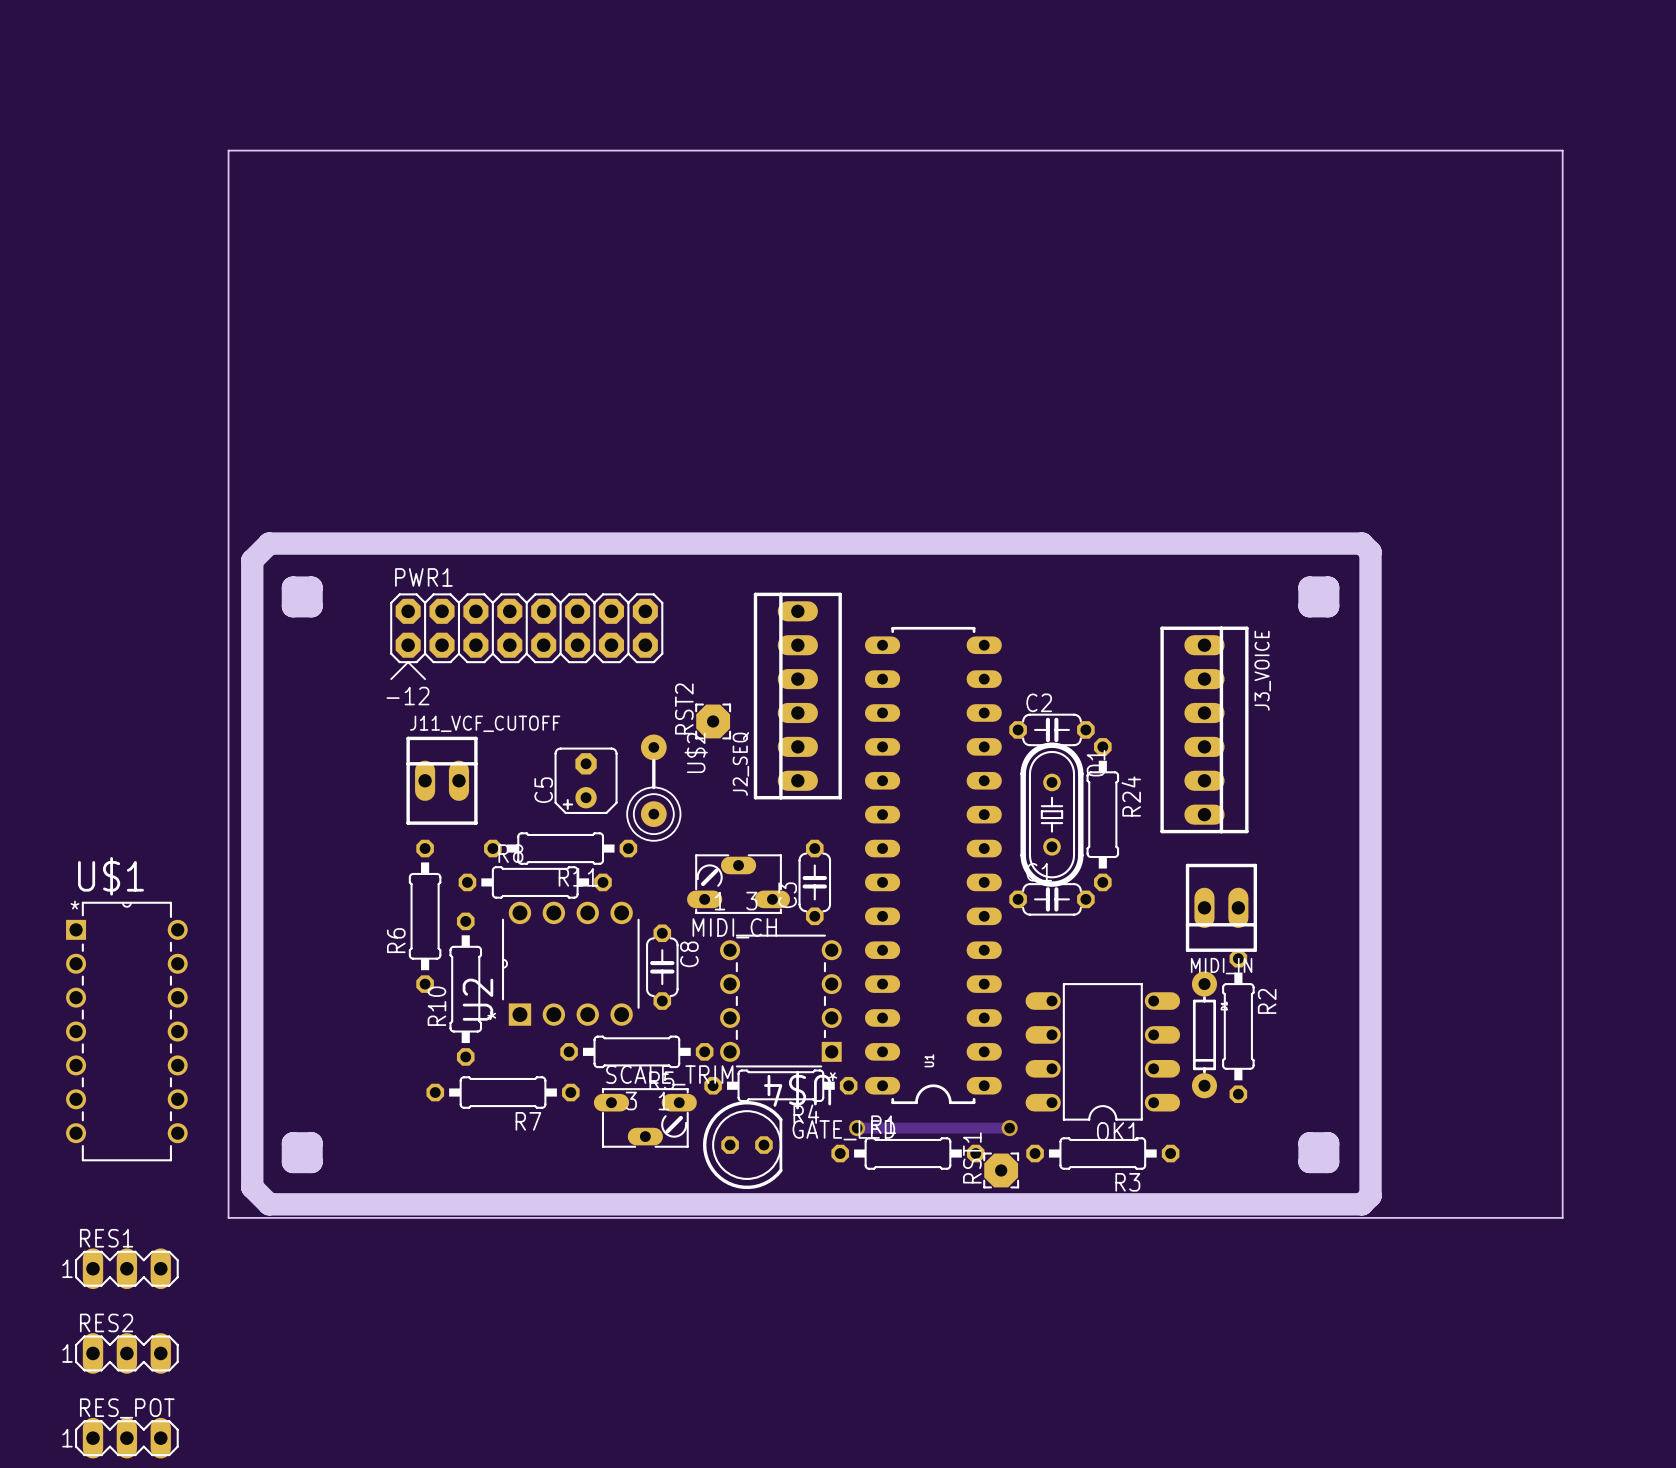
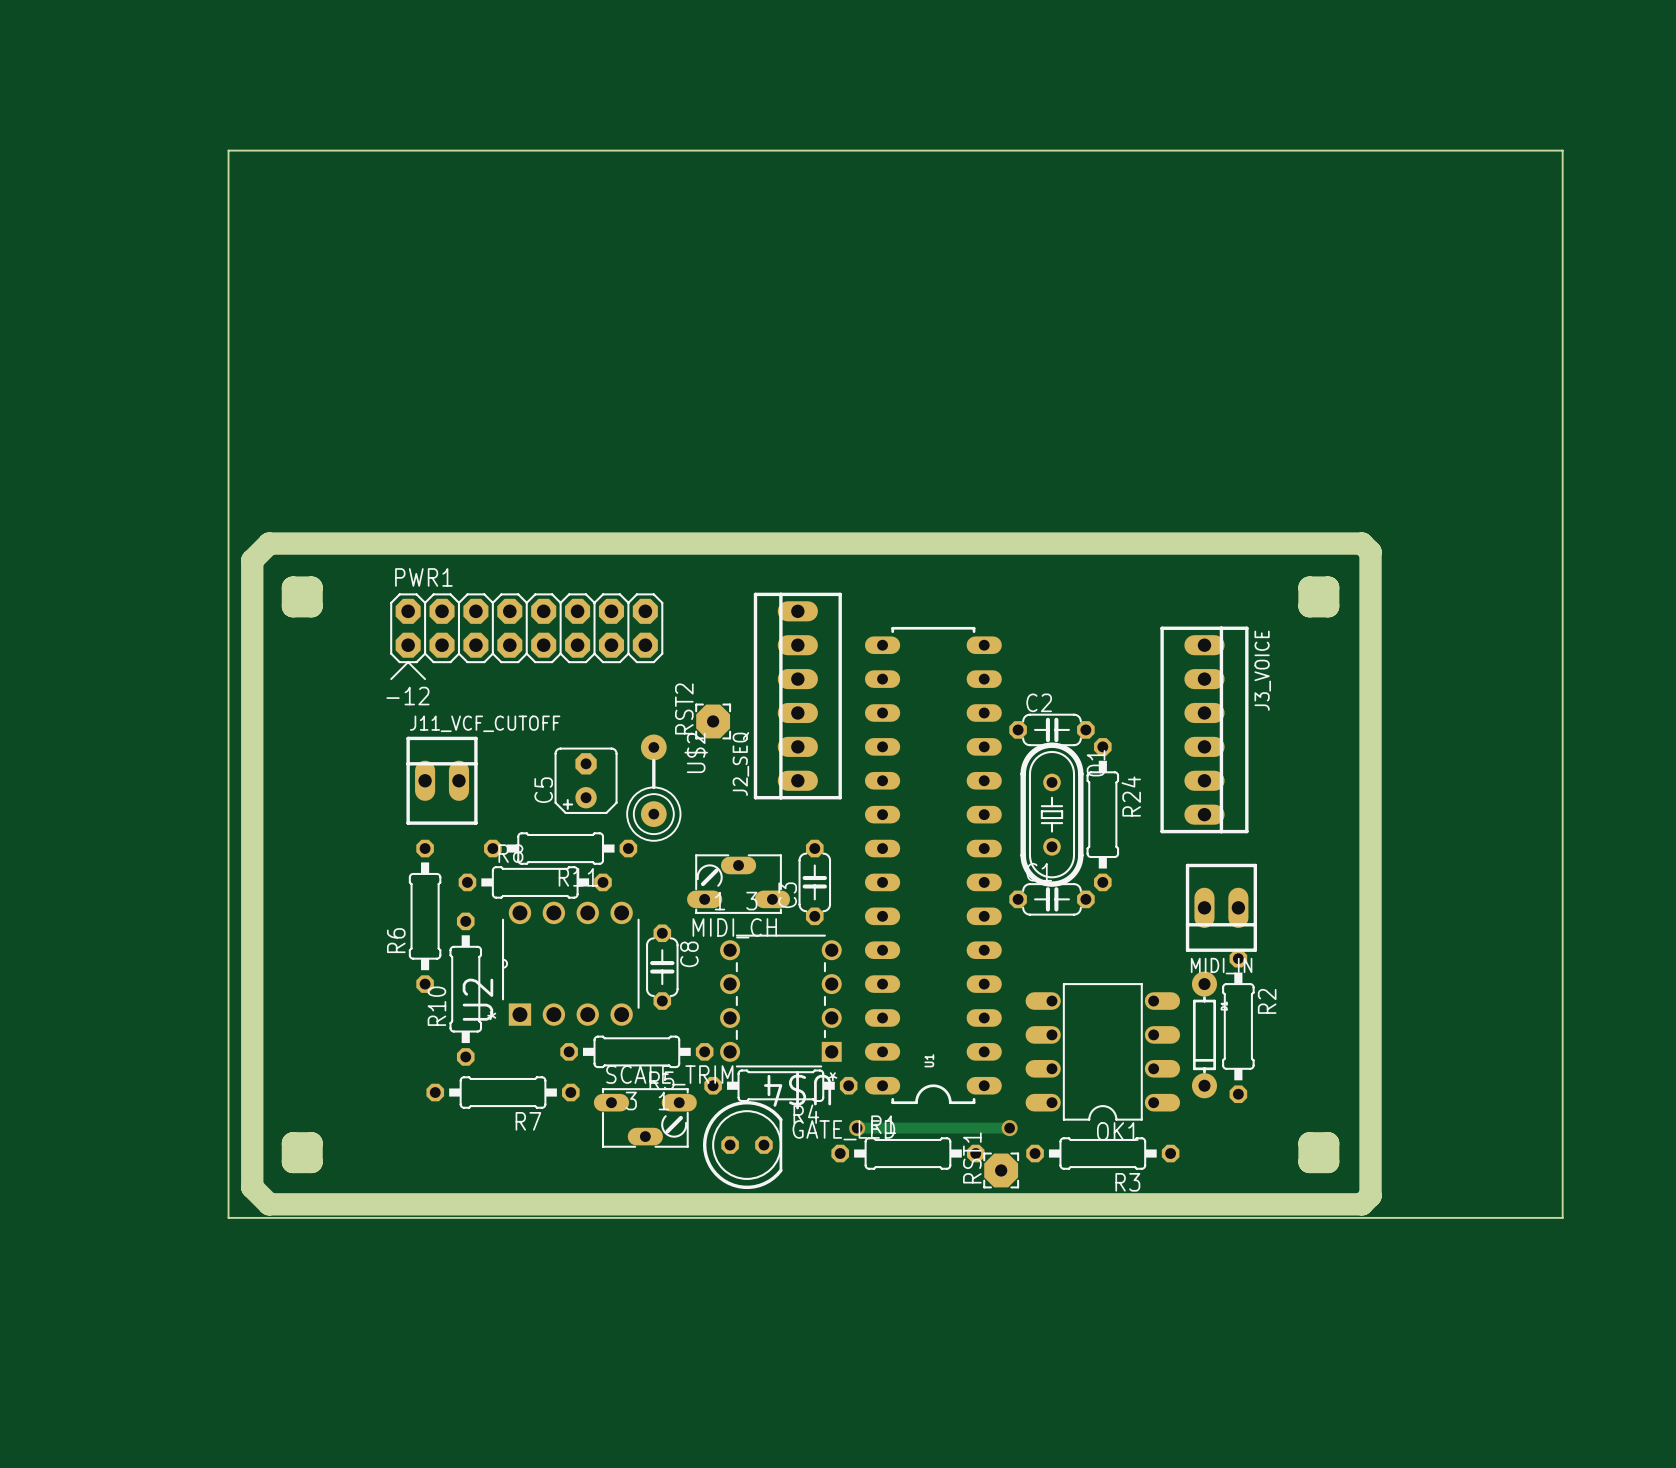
U$1: (126, 1031) -> none
RES1: (126, 1268) -> none
RES2: (126, 1353) -> none
RES_POT: (126, 1438) -> none

